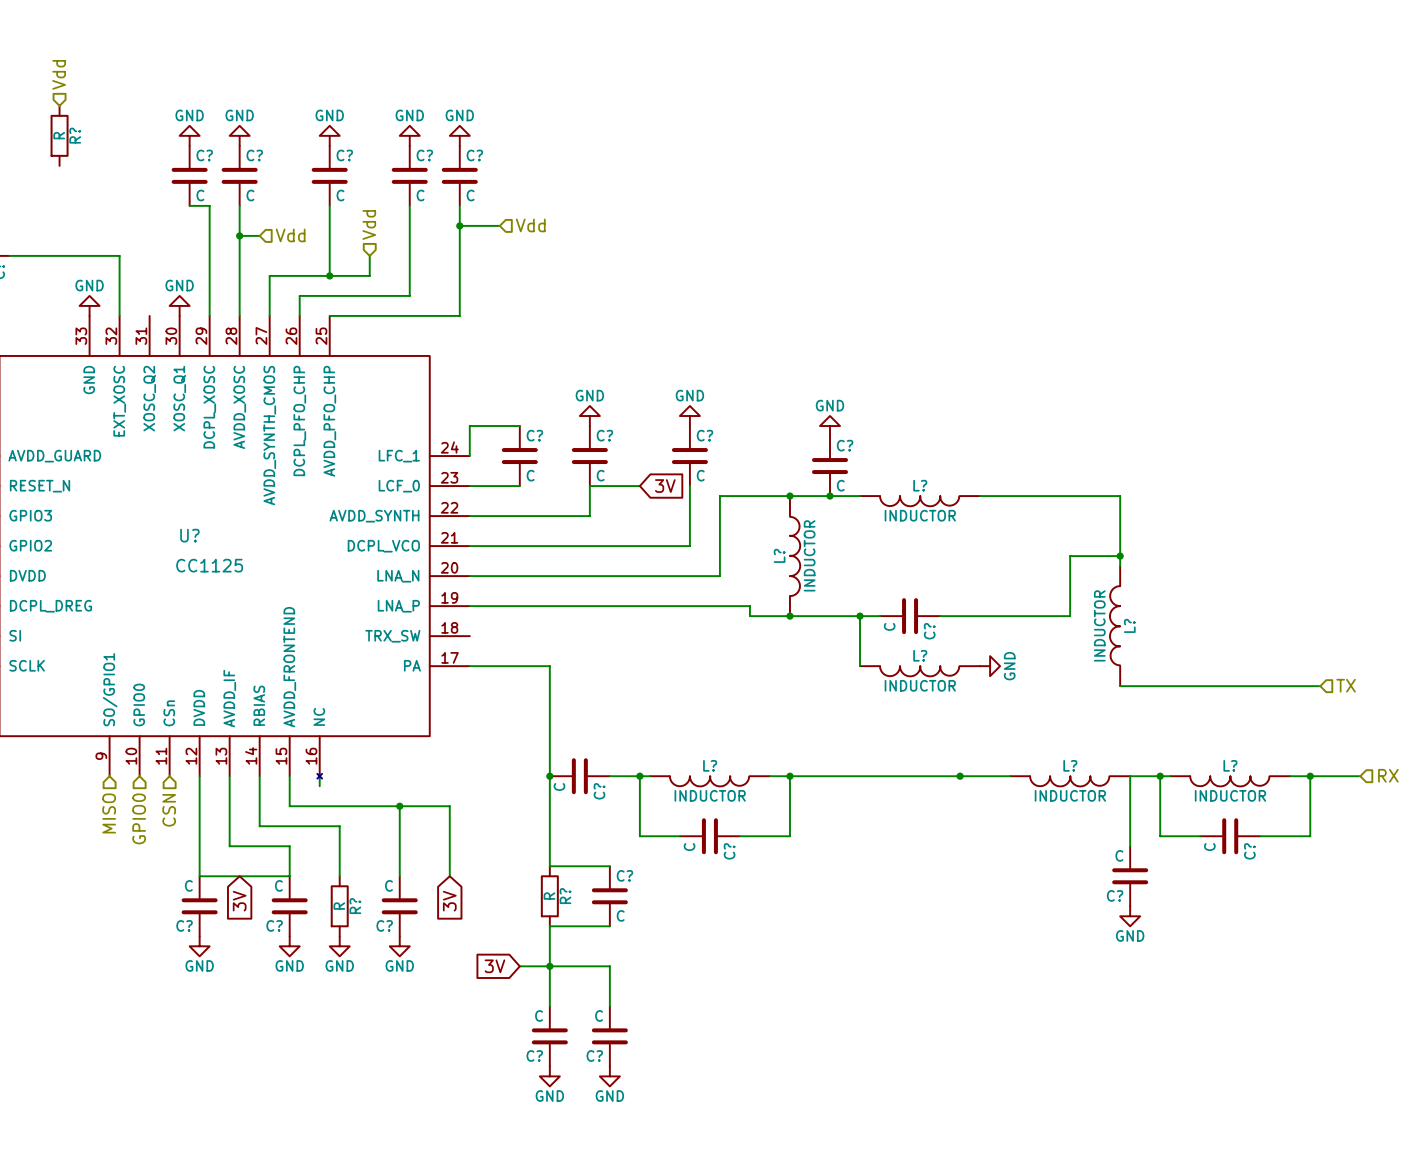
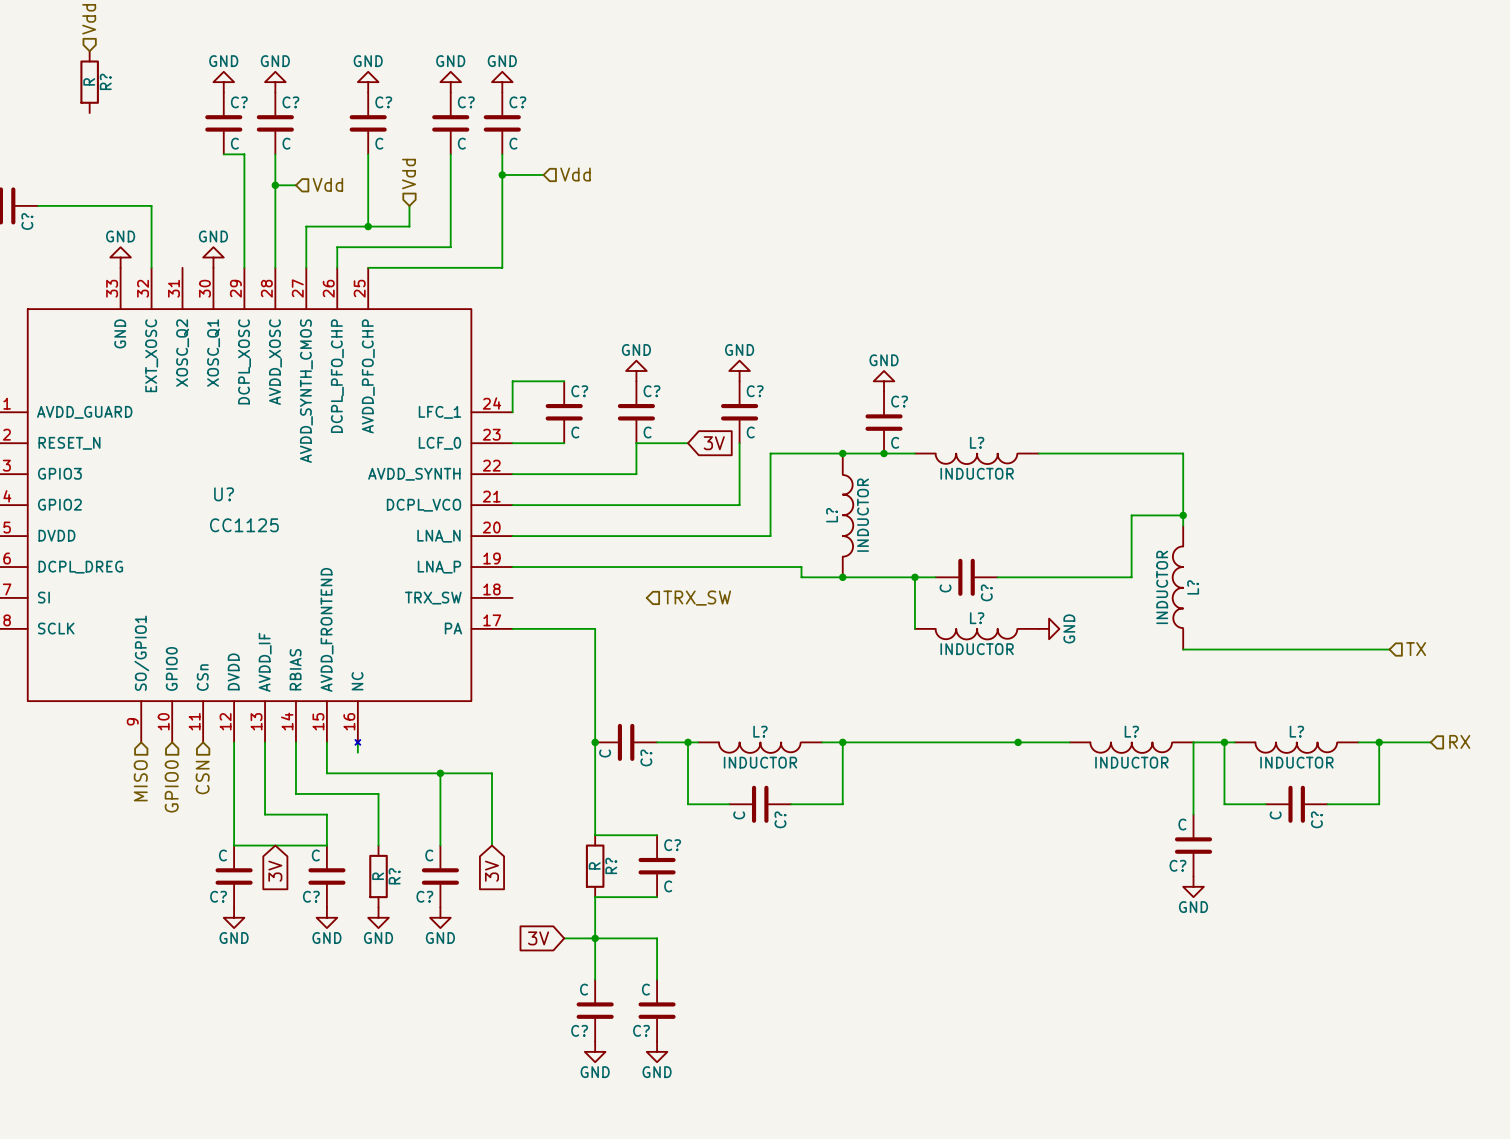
hierarchical label: none -> TRX_SW (697, 598)

